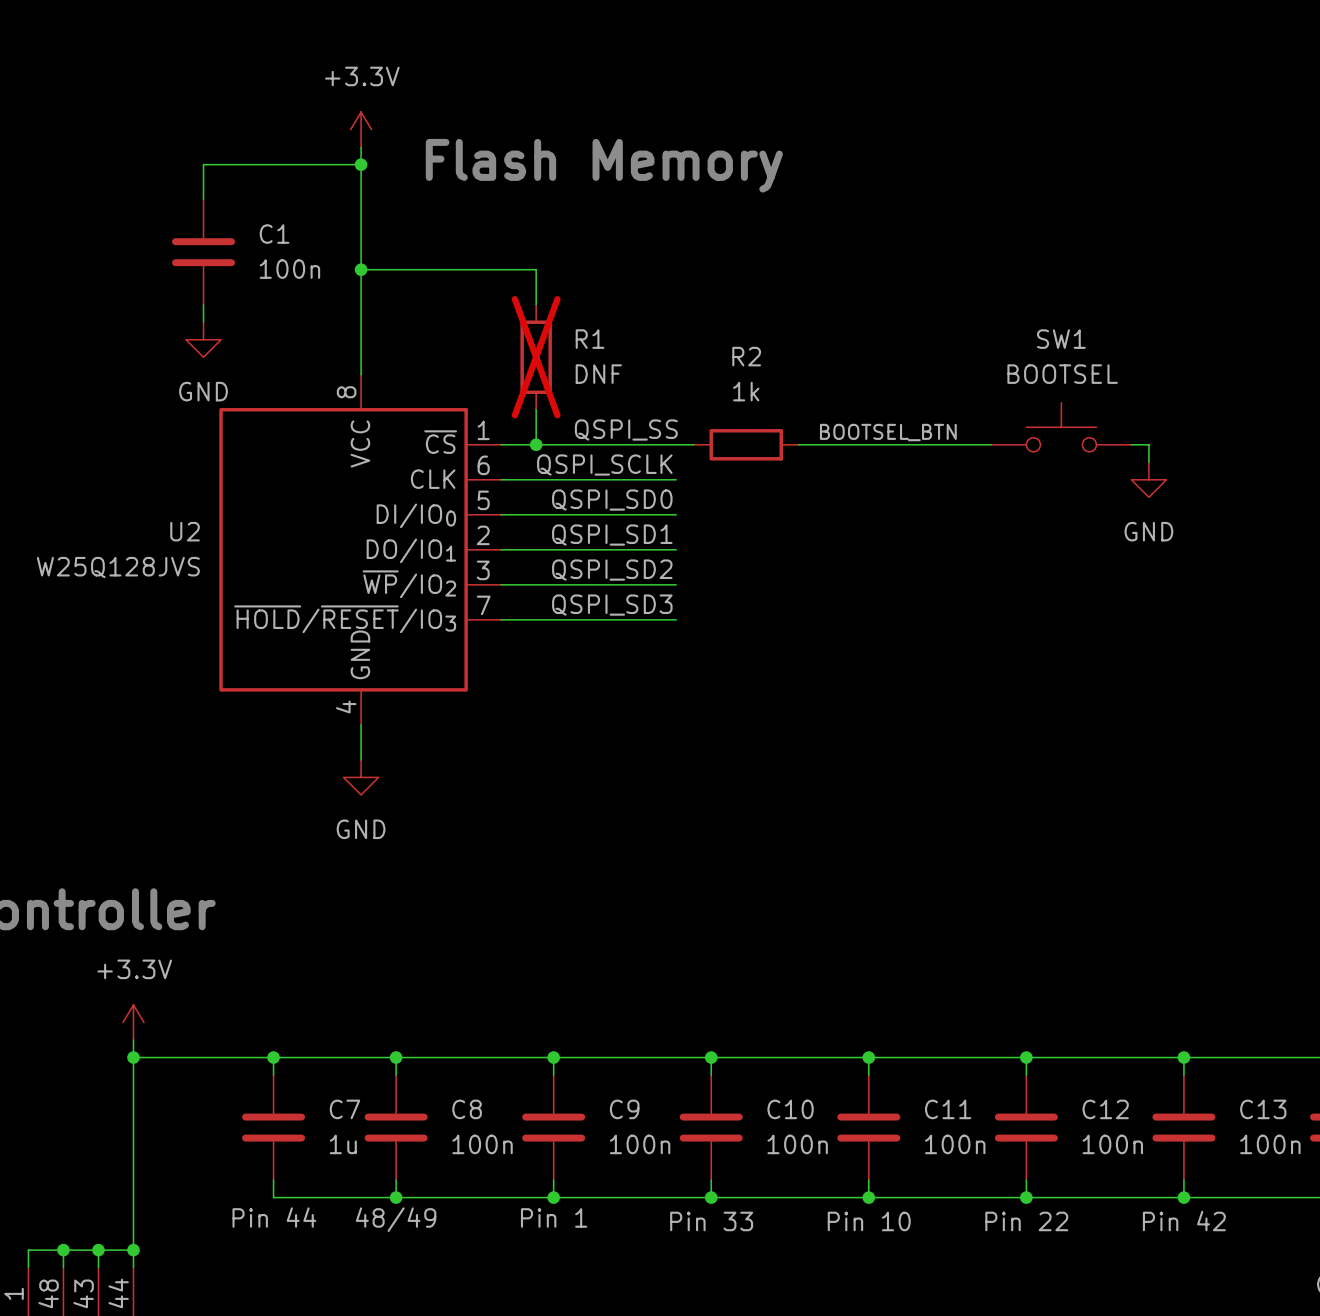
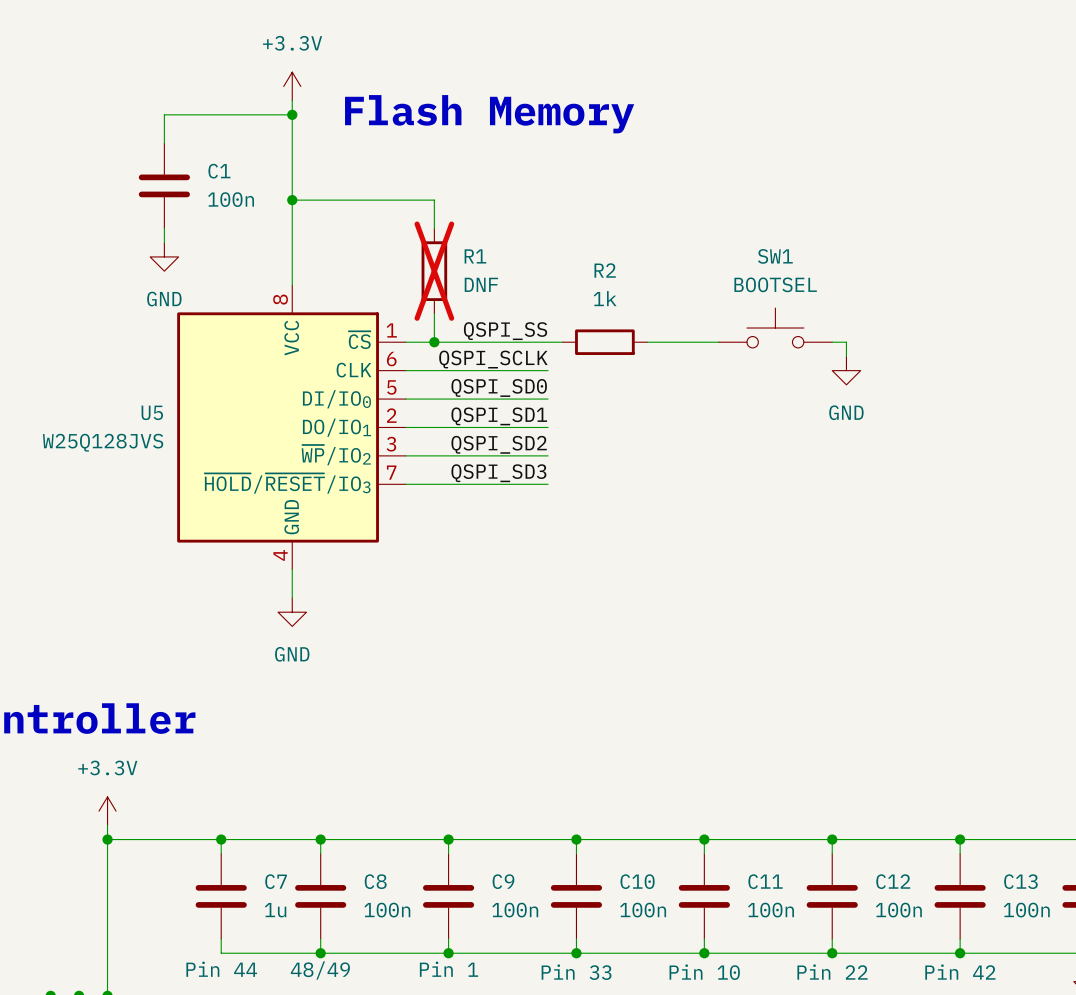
SW1 position: (1061, 427) -> (775, 328)
label: BOOTSEL_BTN (888, 432) -> none
wire: (886, 444) (991, 444) -> none
wire: (1131, 444) (1148, 444) (1148, 462) -> (832, 342) (846, 342) (846, 356)
power symbol position: GND (1148, 479) -> GND (846, 370)
U2 name: U2 (185, 531) -> U5 (152, 412)

